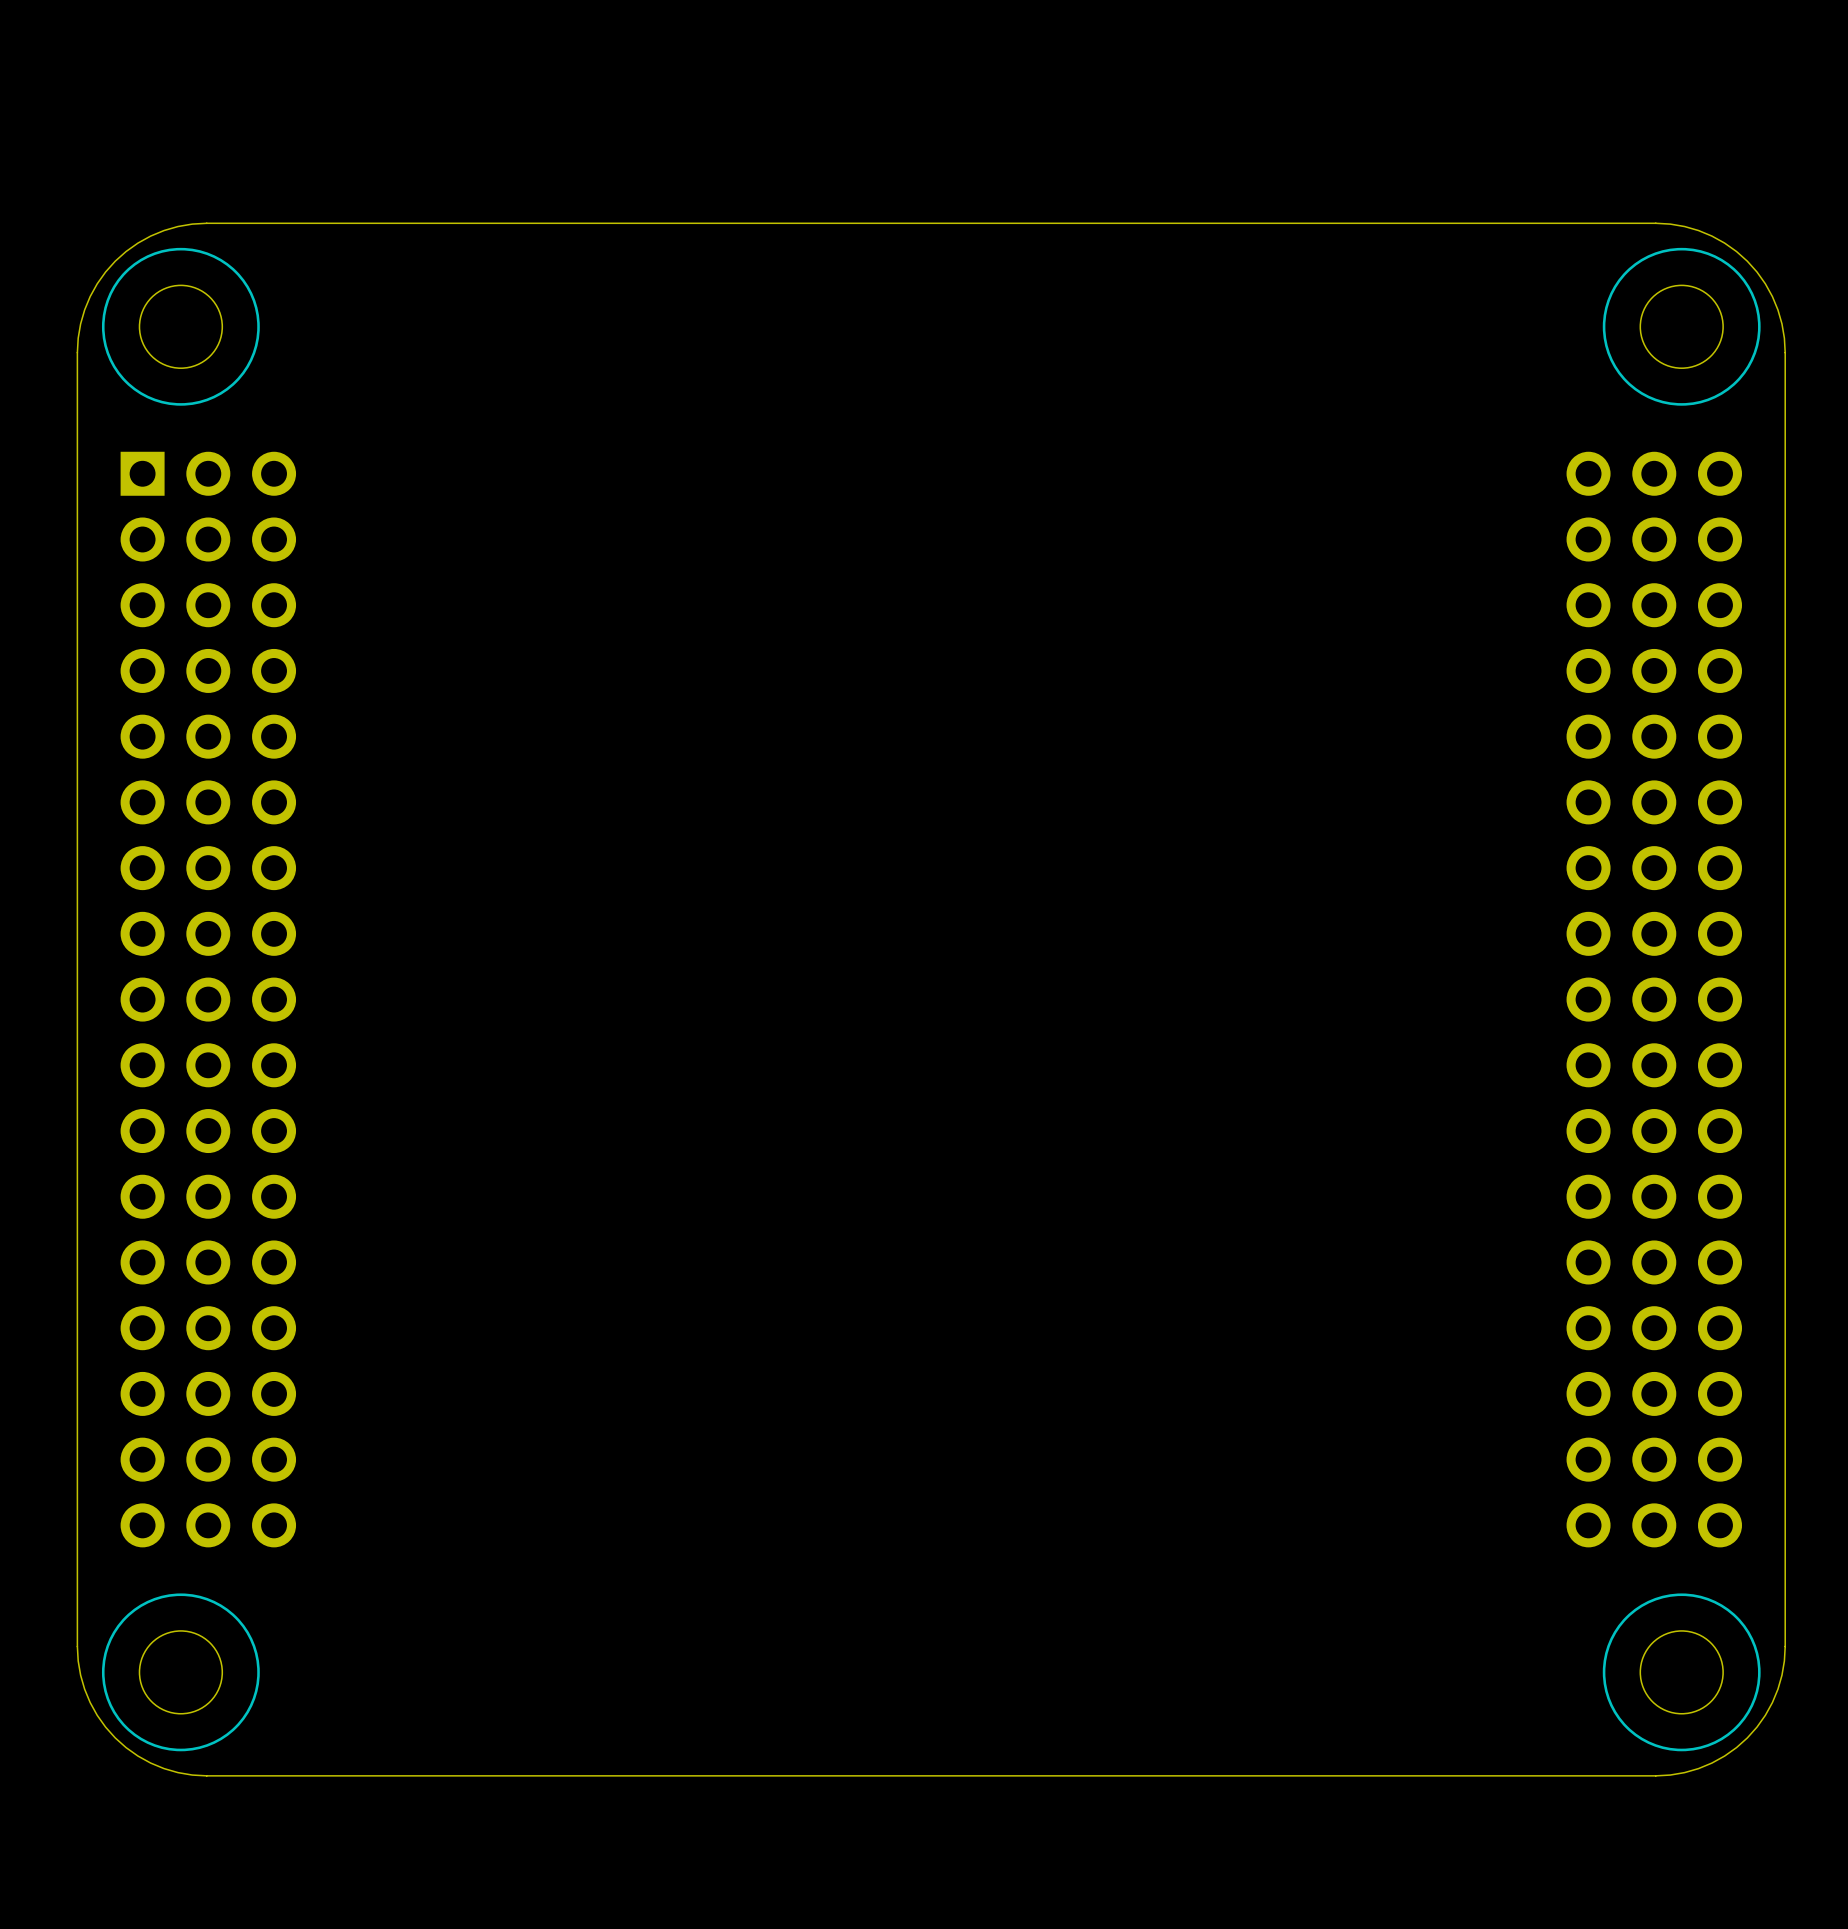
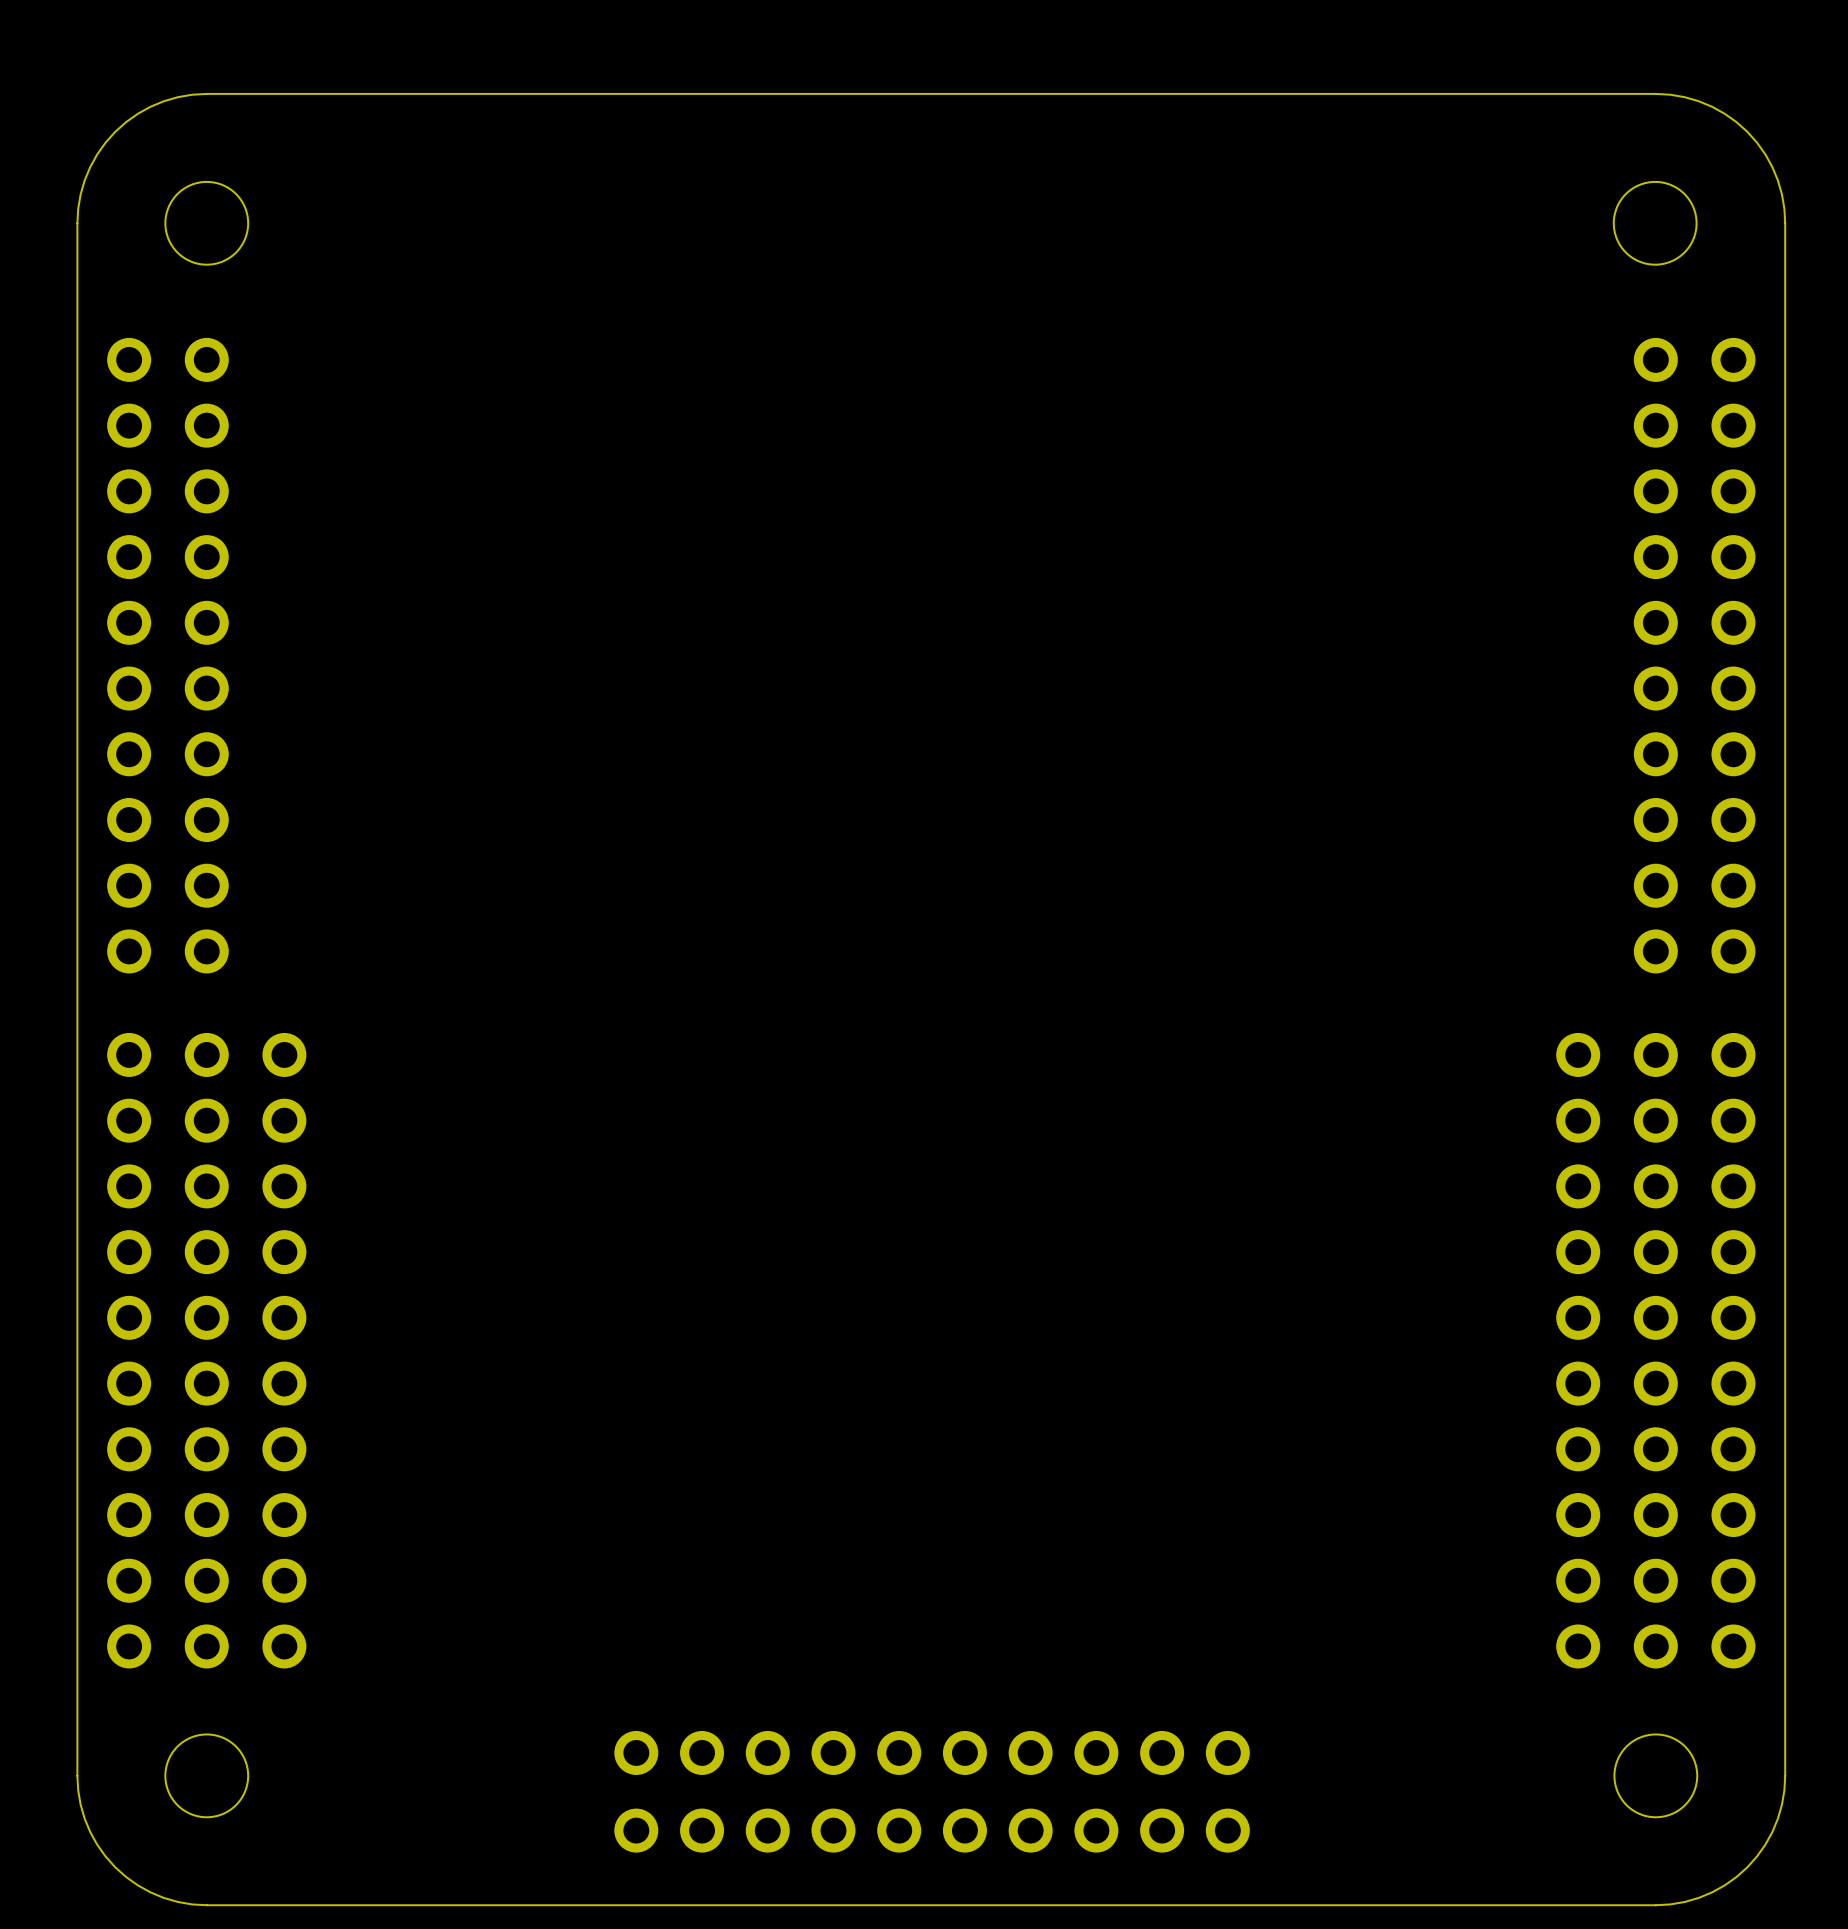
part footprint: [76, 222, 1786, 1777] -> [76, 93, 1786, 1906]

